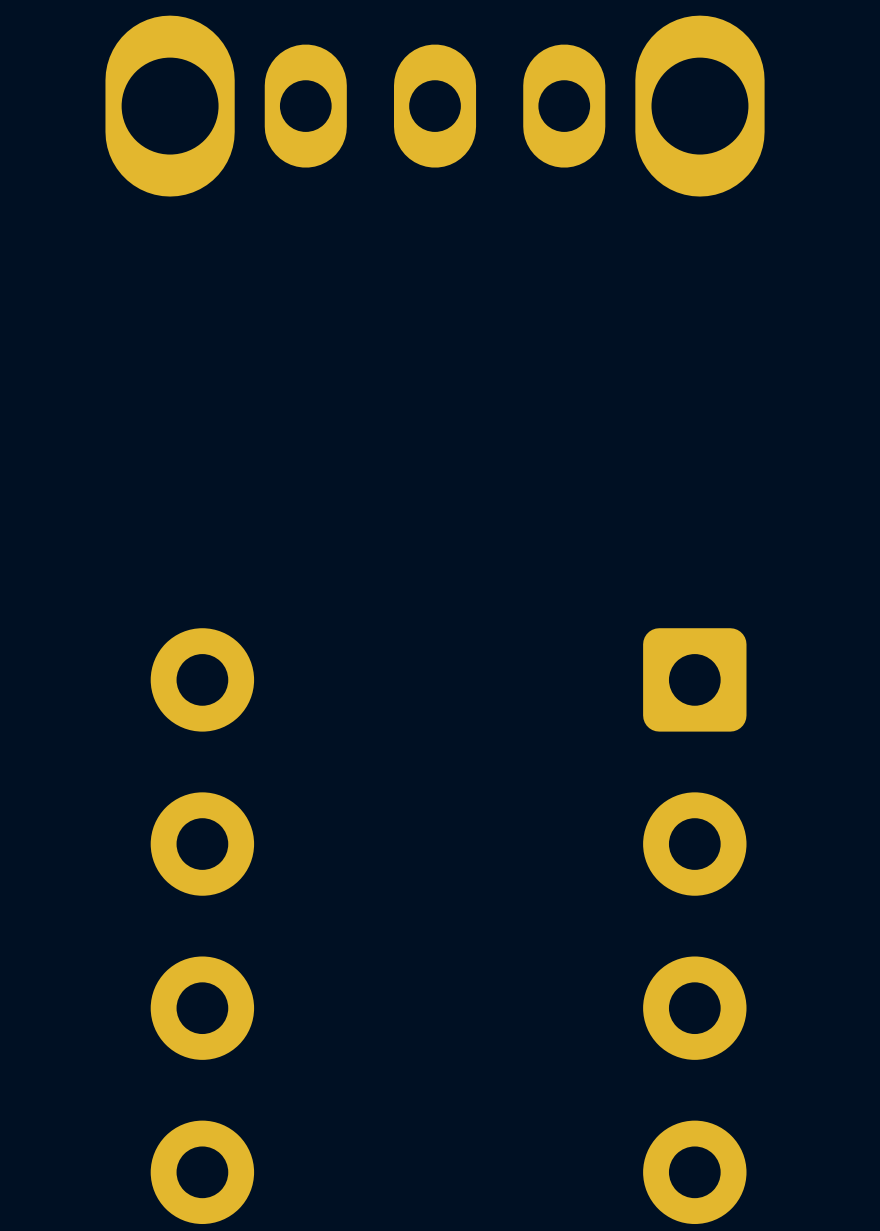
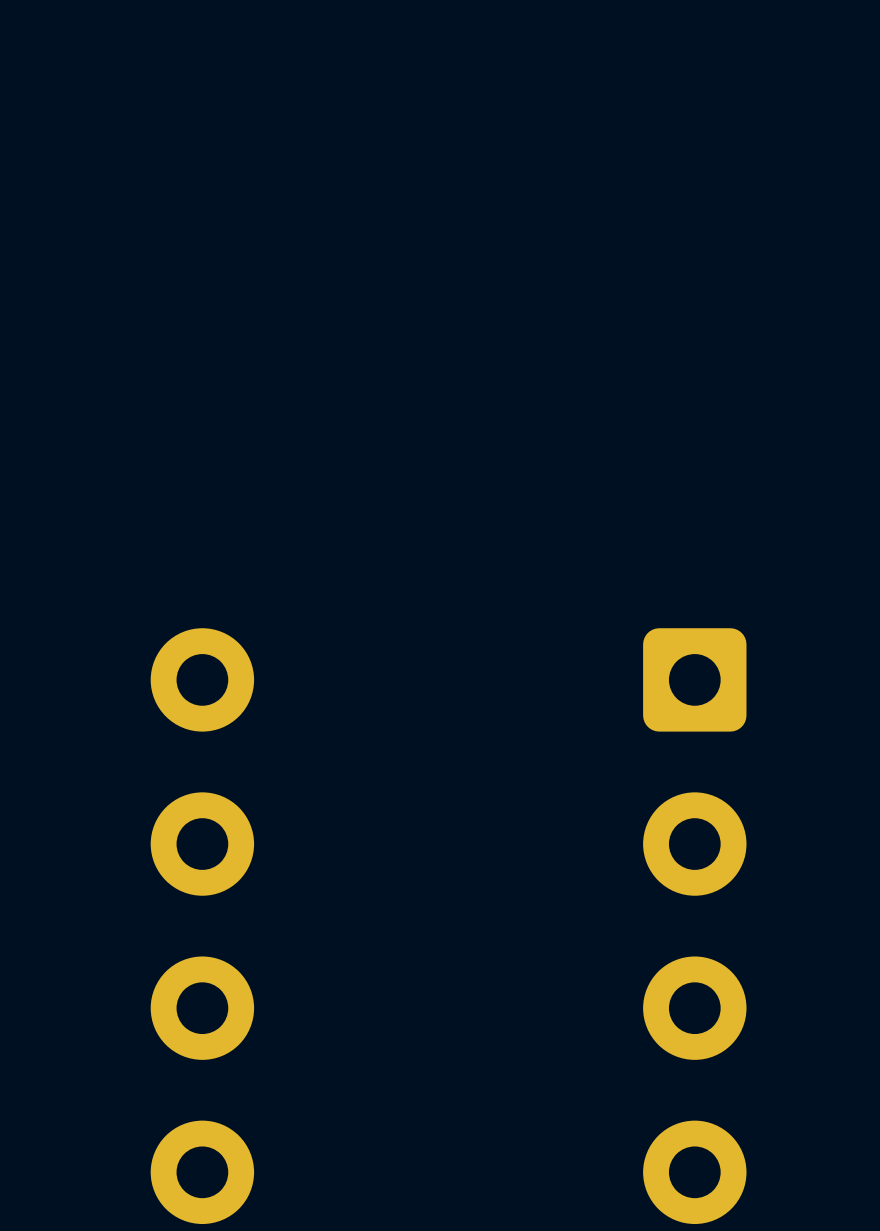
part: (435, 106) -> none

